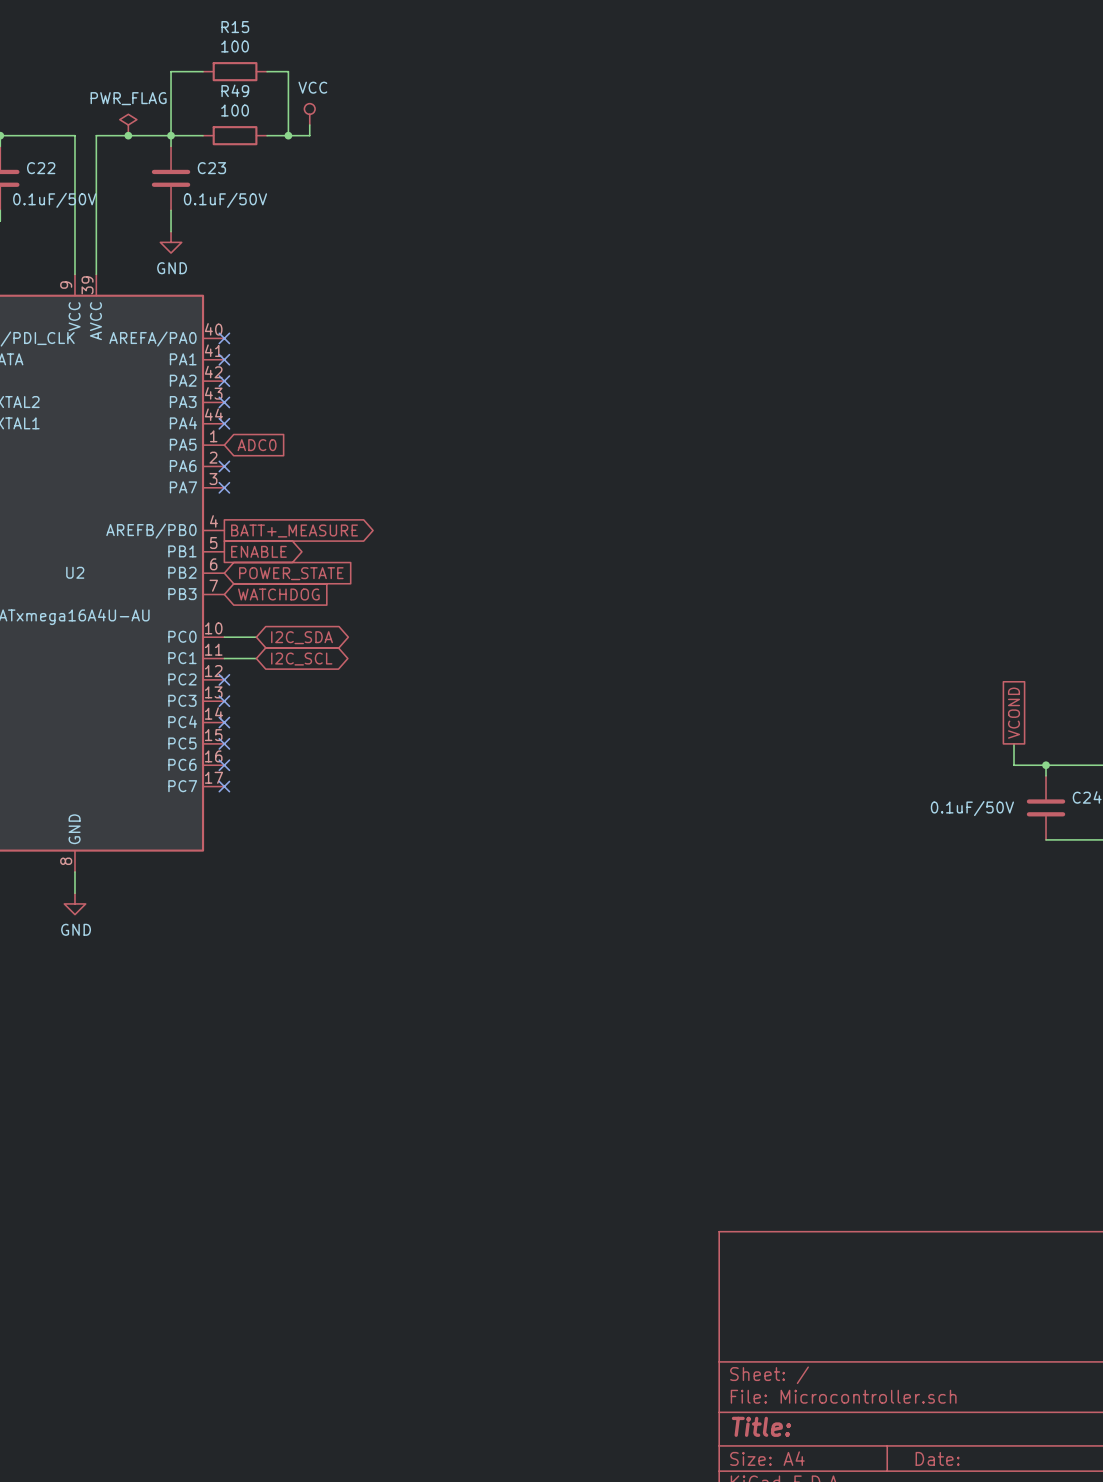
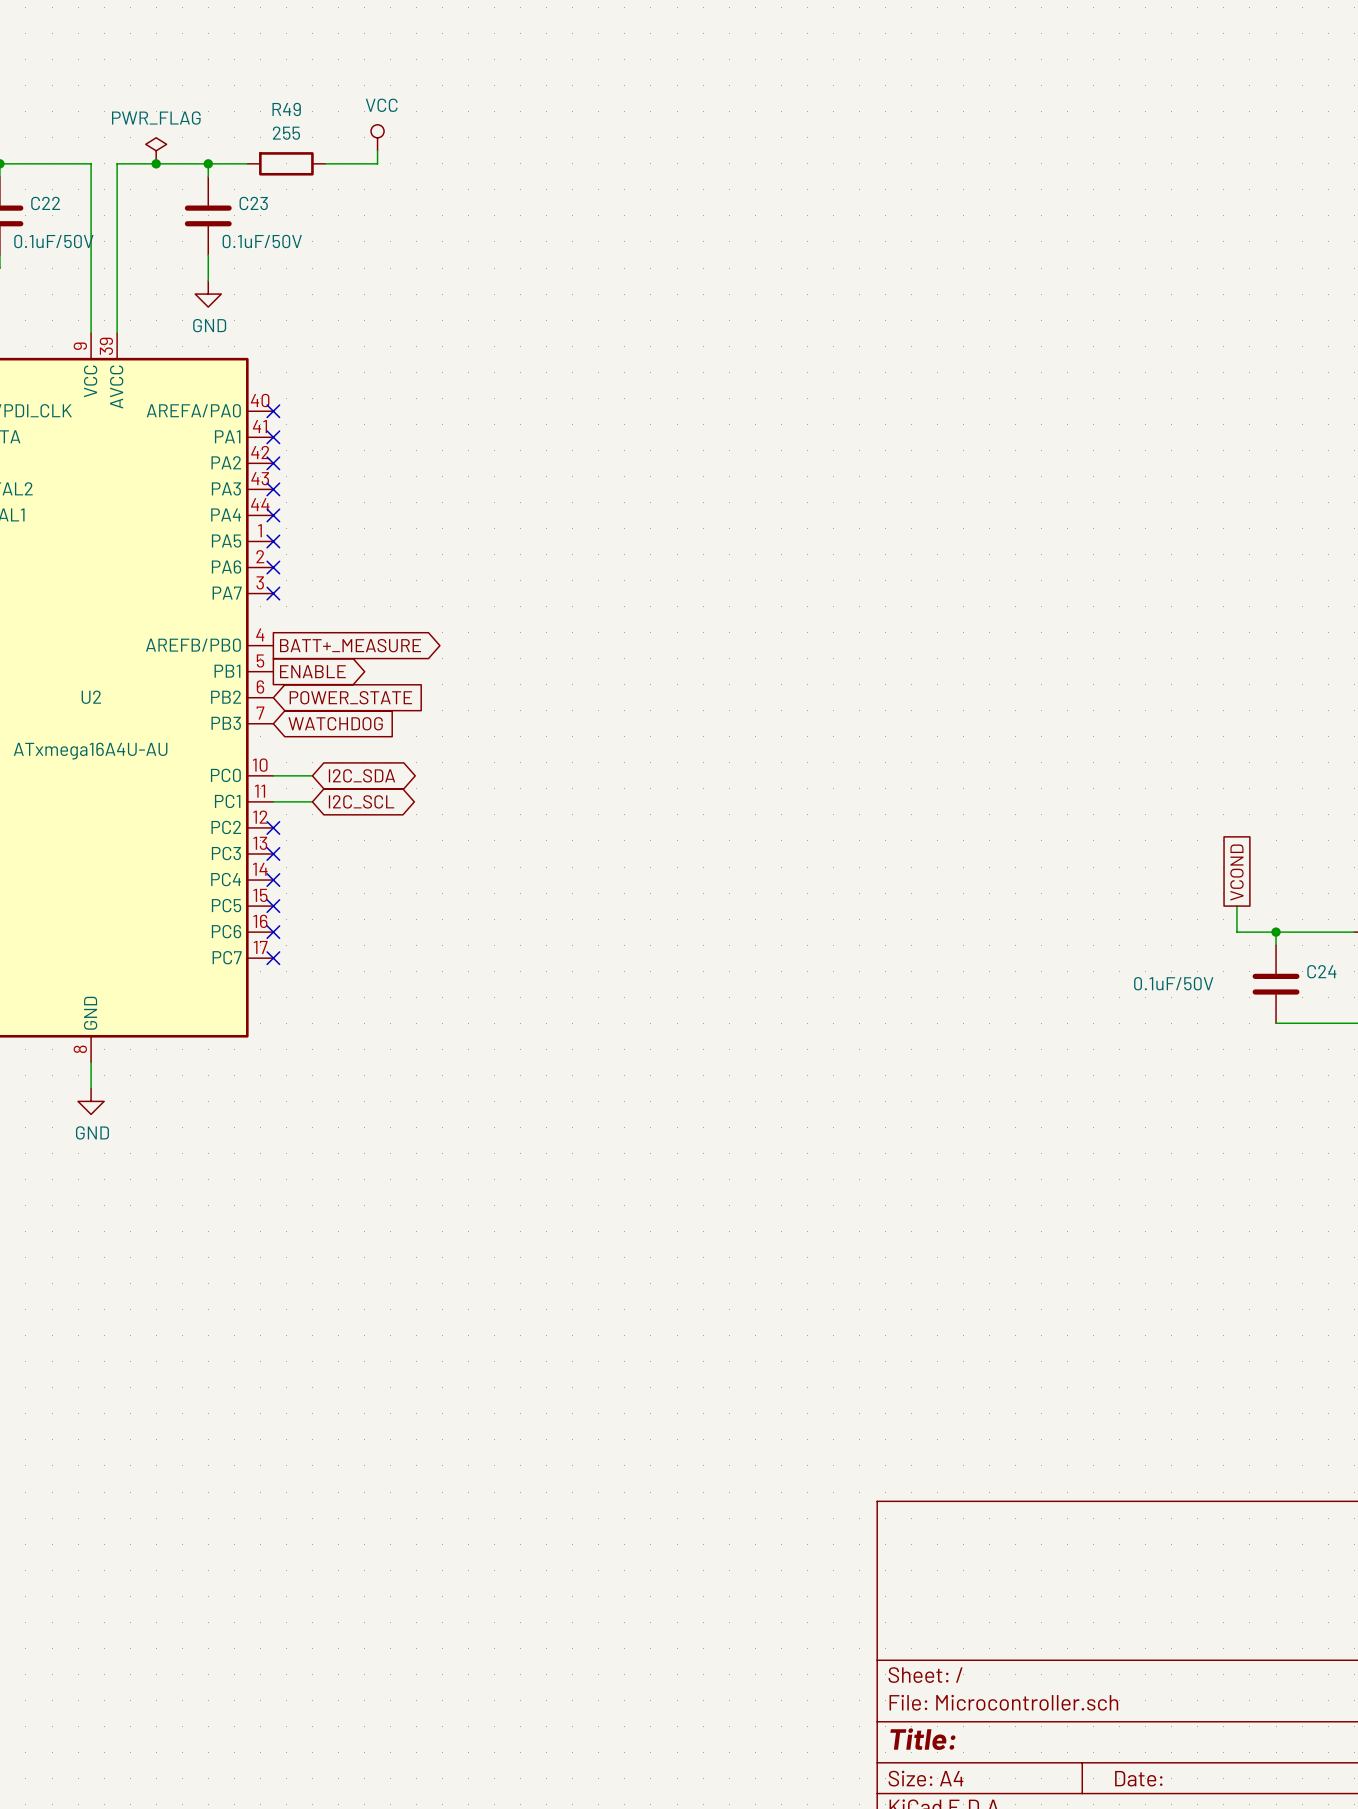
wire: (203, 71) (171, 71) (171, 135) -> none
R15: 100 (235, 71) -> none
wire: (267, 71) (288, 71) (288, 135) -> none
R49 value: 100 (235, 110) -> 255 (286, 133)
junction: (288, 135) -> none
no-connect mark: none -> (273, 541)
global label: ADC0 (257, 445) -> none

